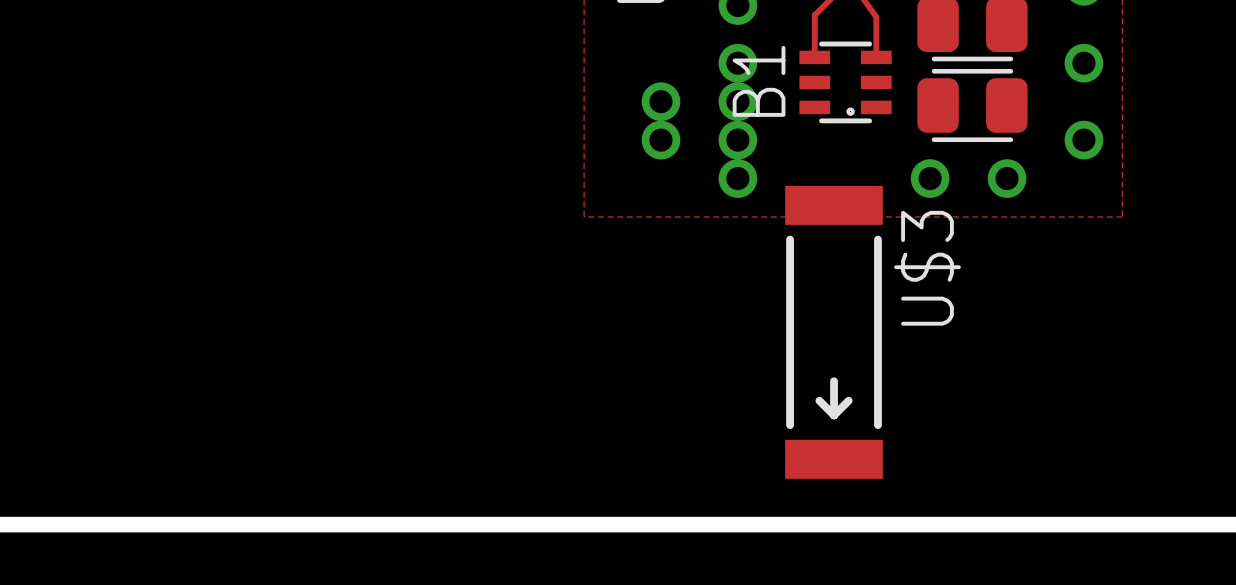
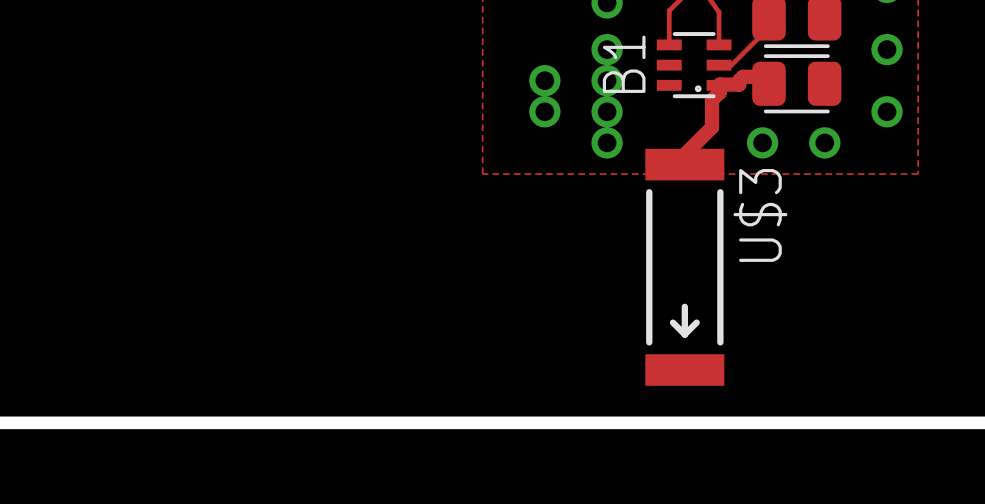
track: none -> (768, 18) (766, 18) (766, 30) (731, 65) (719, 65)
track: none -> (768, 83) (766, 76) (743, 76) (739, 80) (739, 84) (719, 84) (719, 92) (712, 100) (712, 127) (684, 154) (684, 164)

